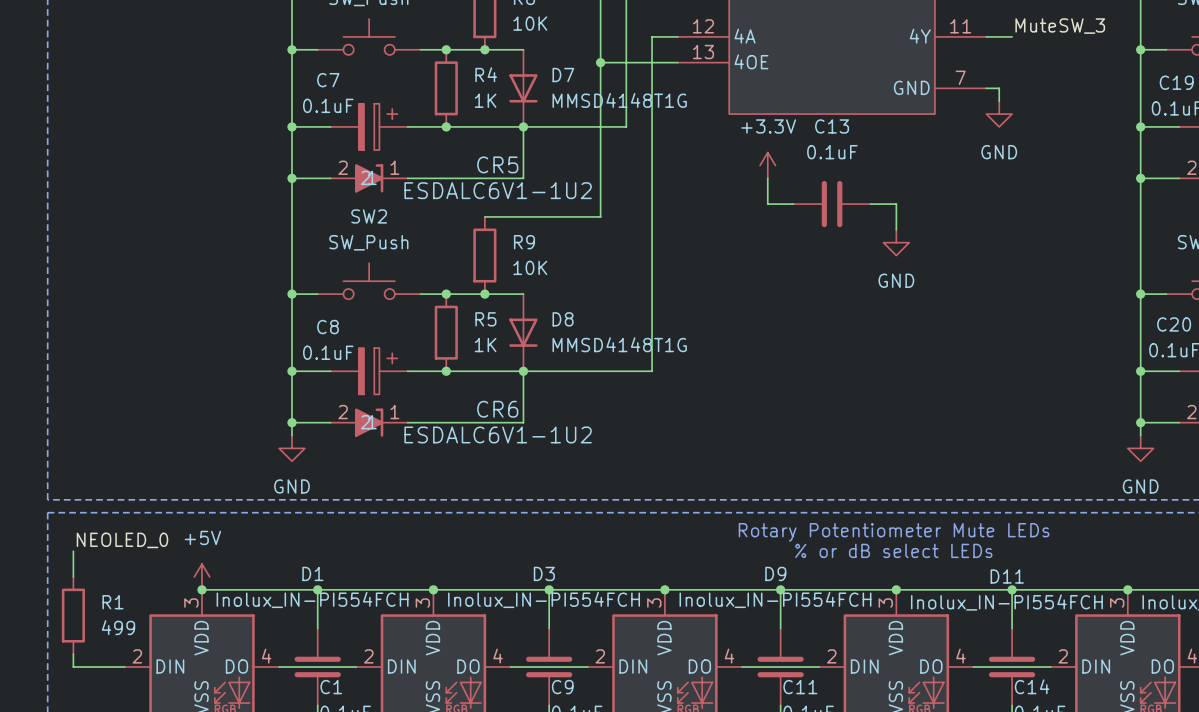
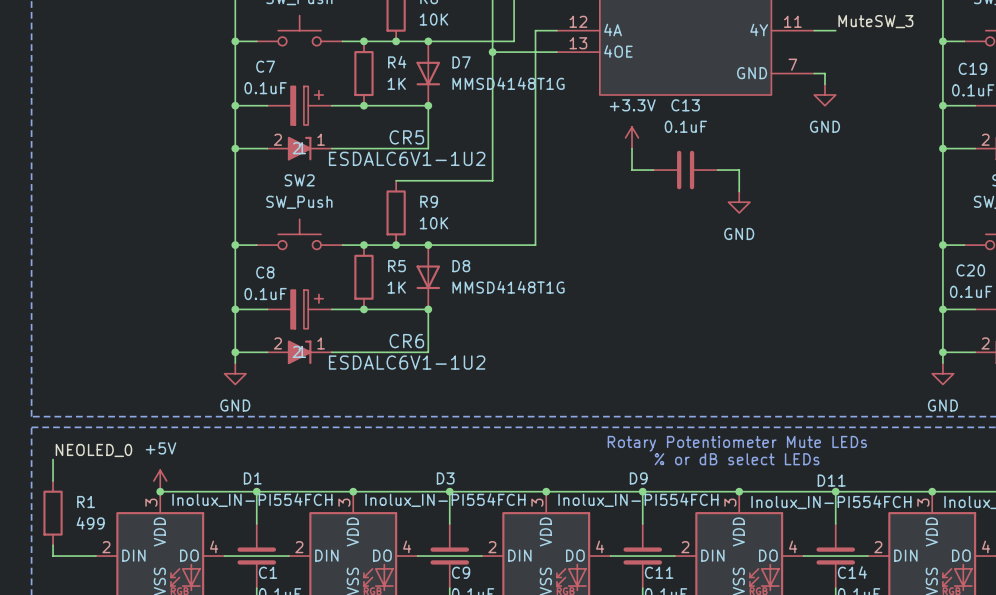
junction: none -> (428, 41)
wire: (626, 49) (626, 126) (523, 126) -> (514, 41) (428, 41)
junction: none -> (428, 245)
wire: (652, 294) (652, 371) (523, 371) -> (535, 245) (428, 245)

